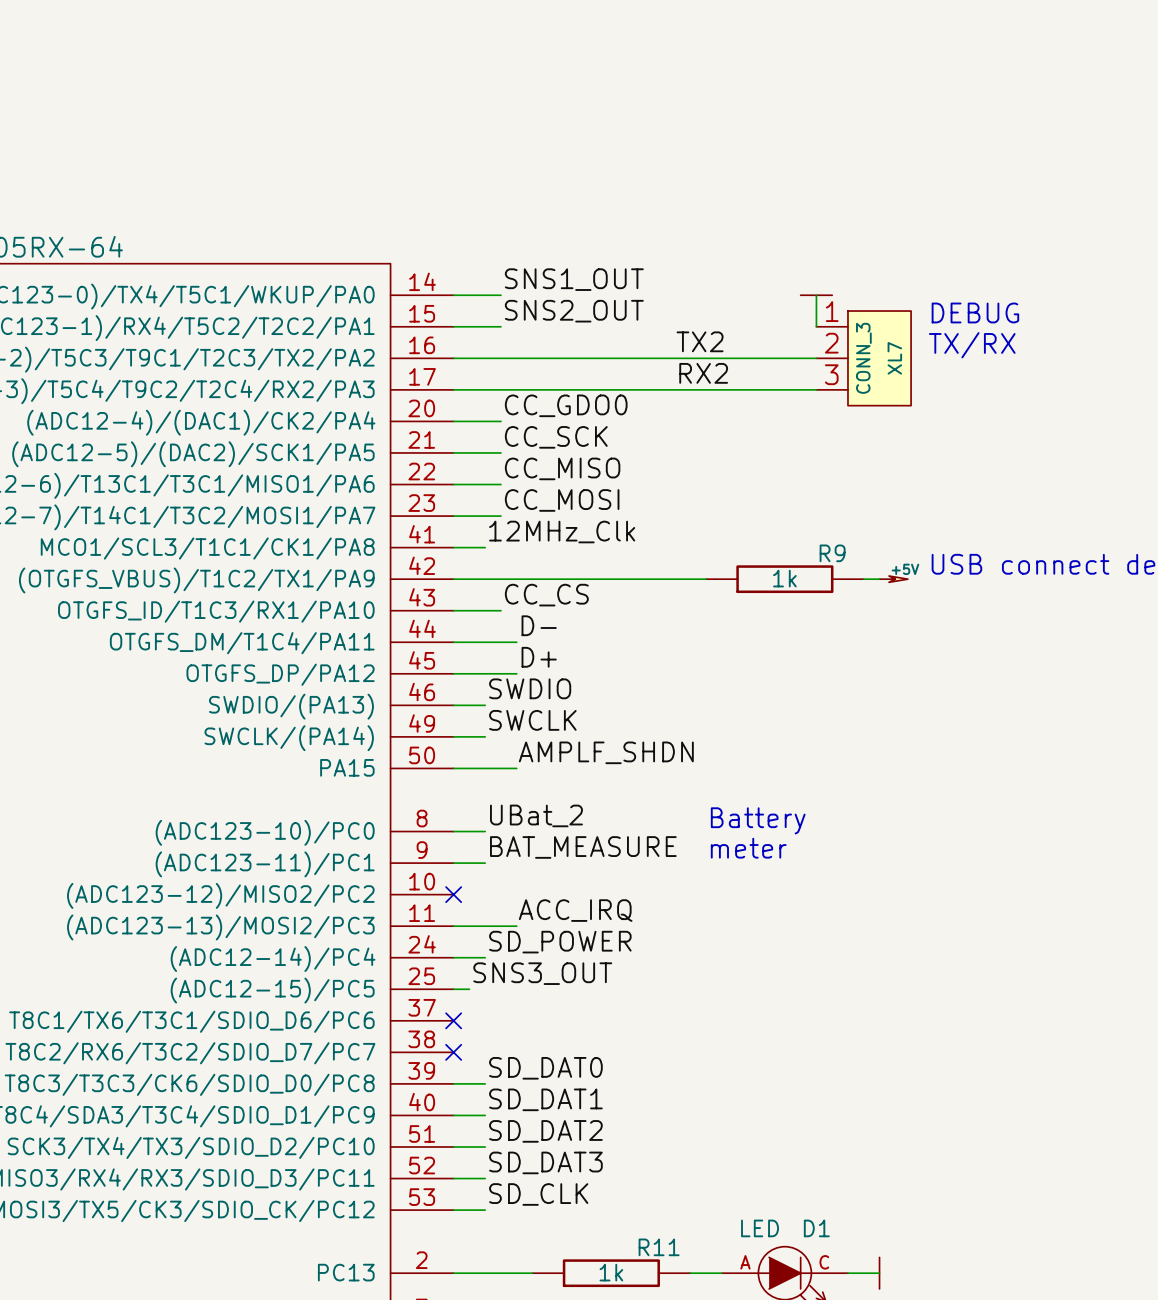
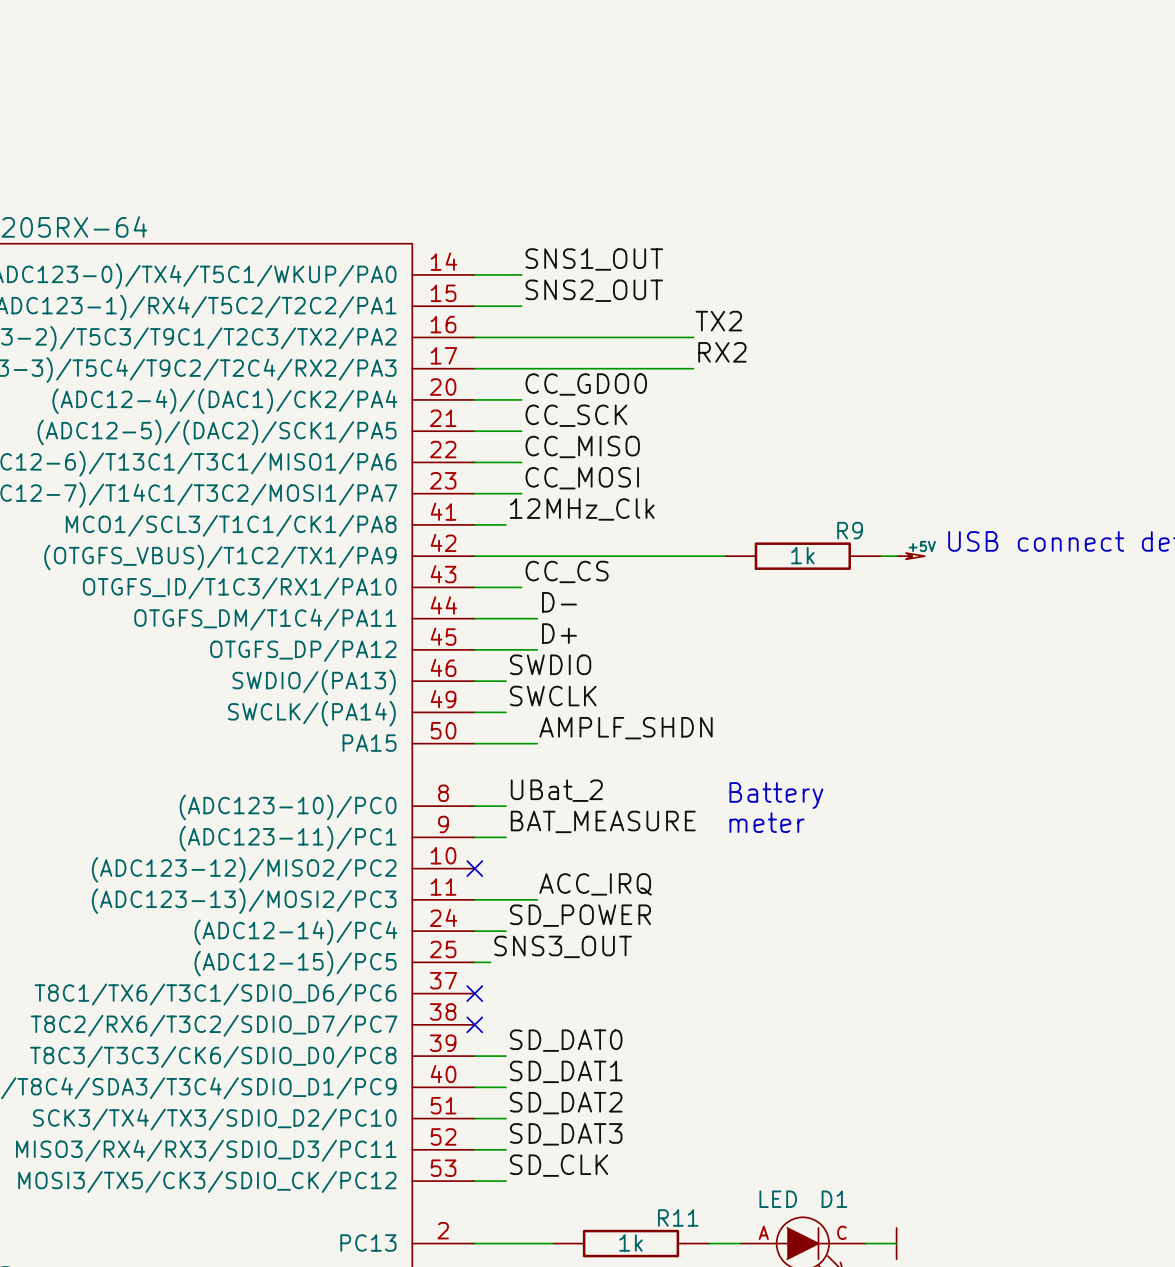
wire: (816, 295) (816, 326) -> none
power symbol: (816, 295) -> none
text: DEBUG (975, 312) -> none
text: TX/RX (972, 345) -> none
wire: (674, 358) (816, 358) -> none
XL7: CONN_3 (863, 358) -> none
wire: (674, 389) (816, 389) -> none

